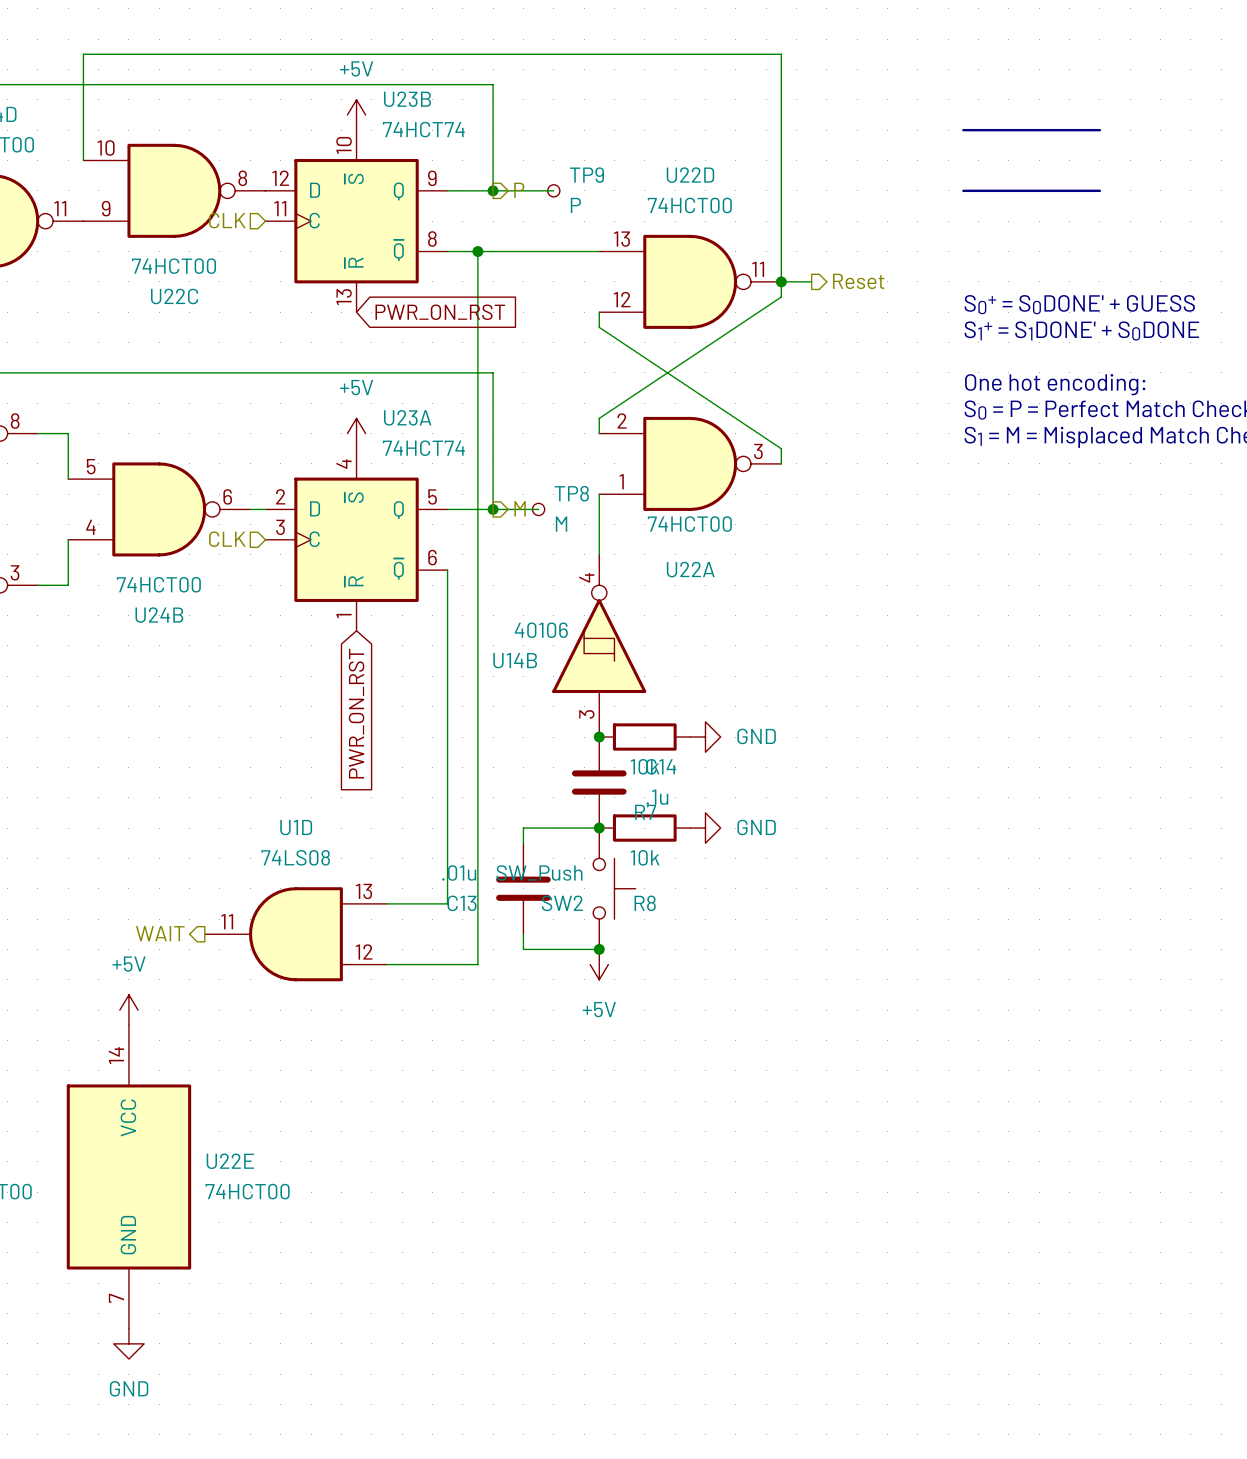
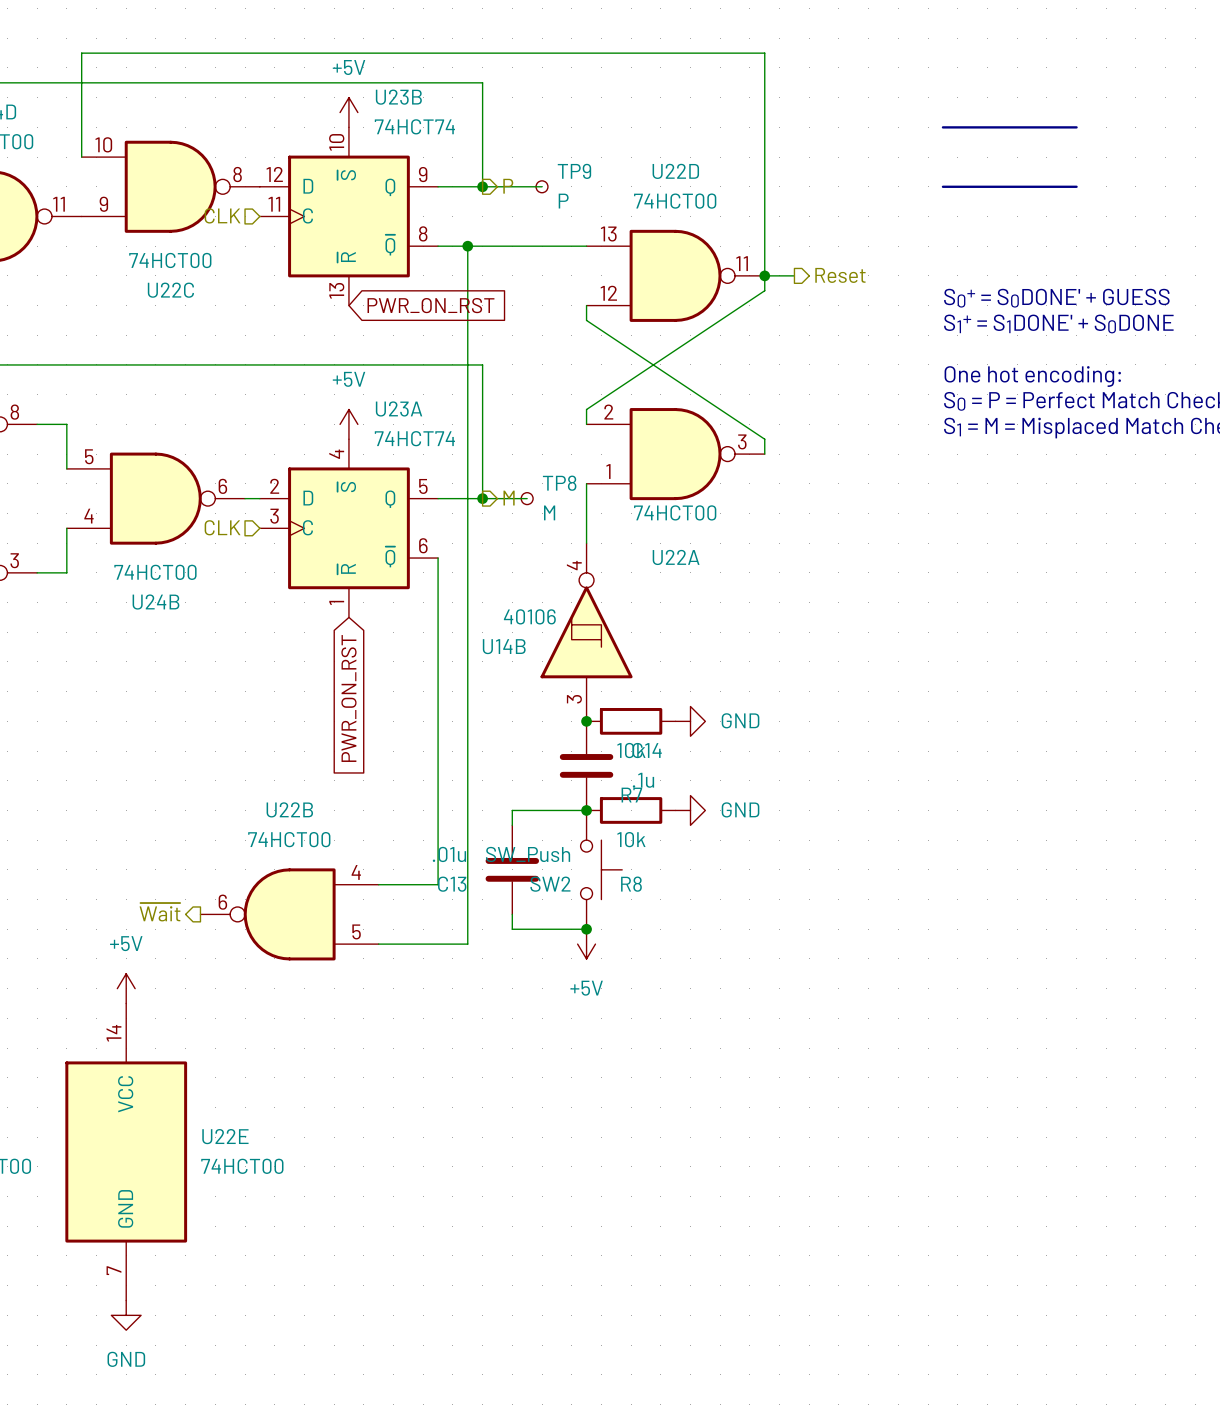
hierarchical label: WAIT (160, 933) -> ~{Wait} (159, 912)
U1D: 74LS08 (295, 934) -> none
U22B: none -> 74HCT00 (289, 914)

